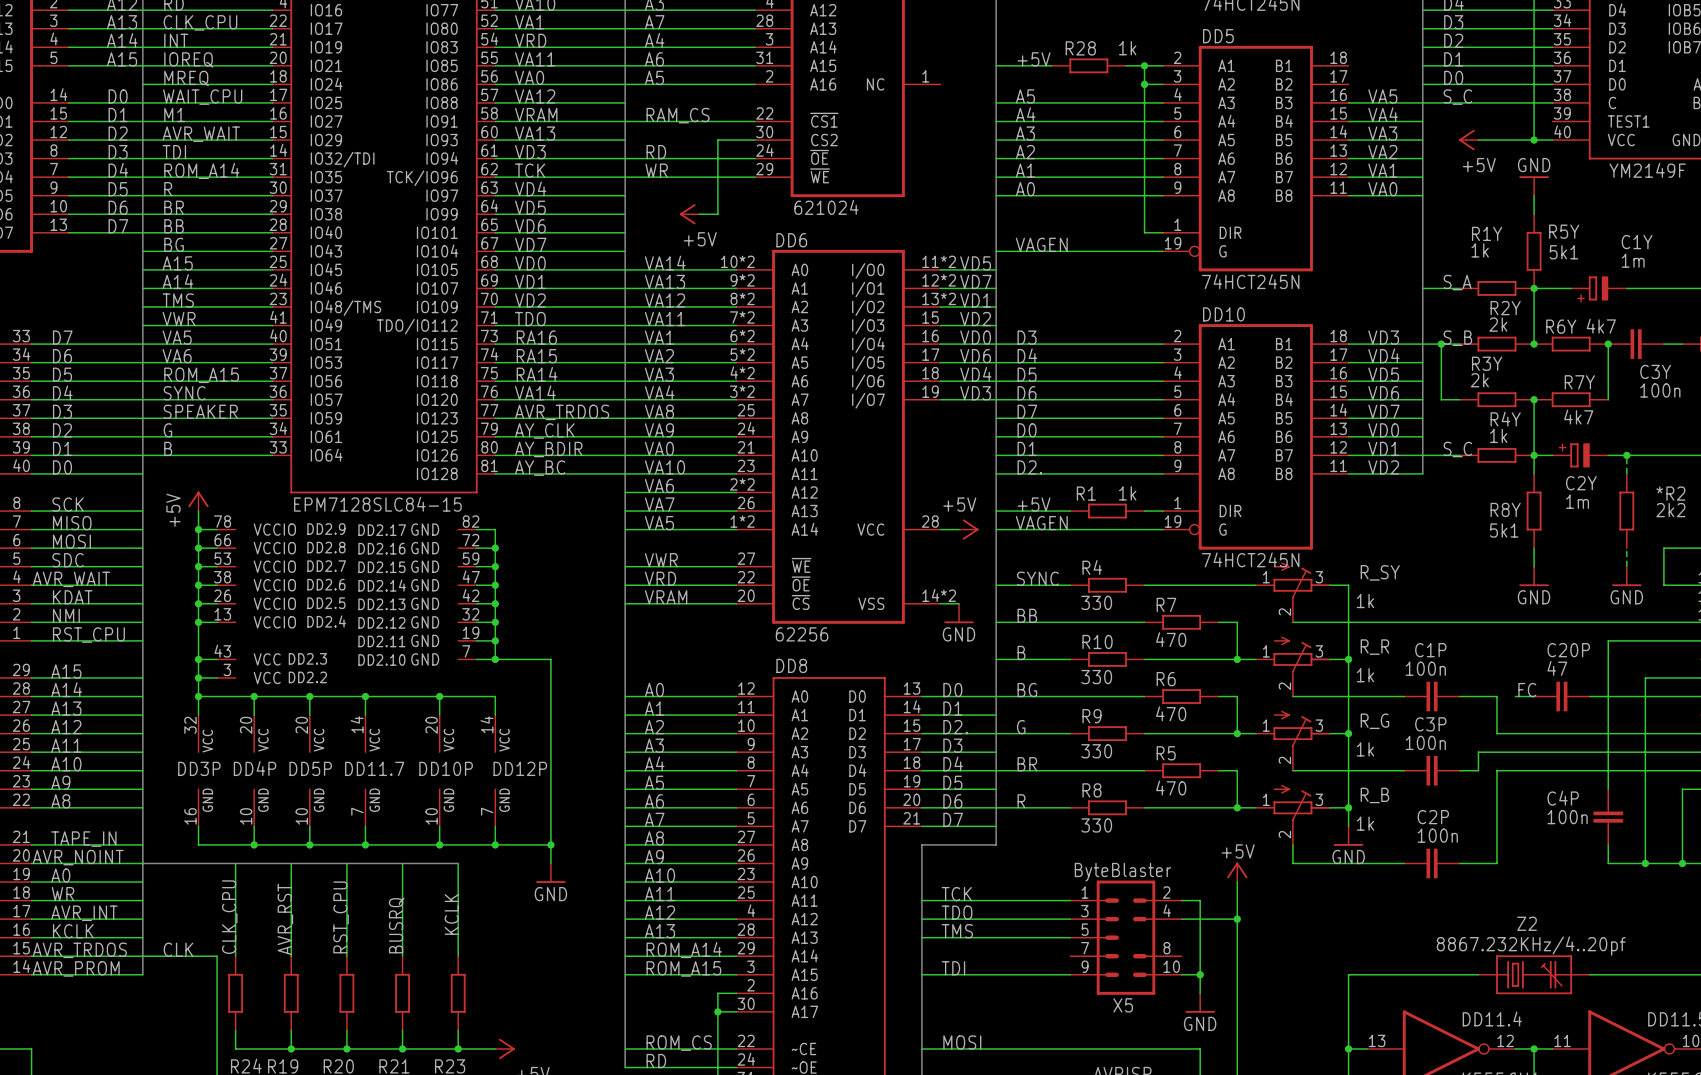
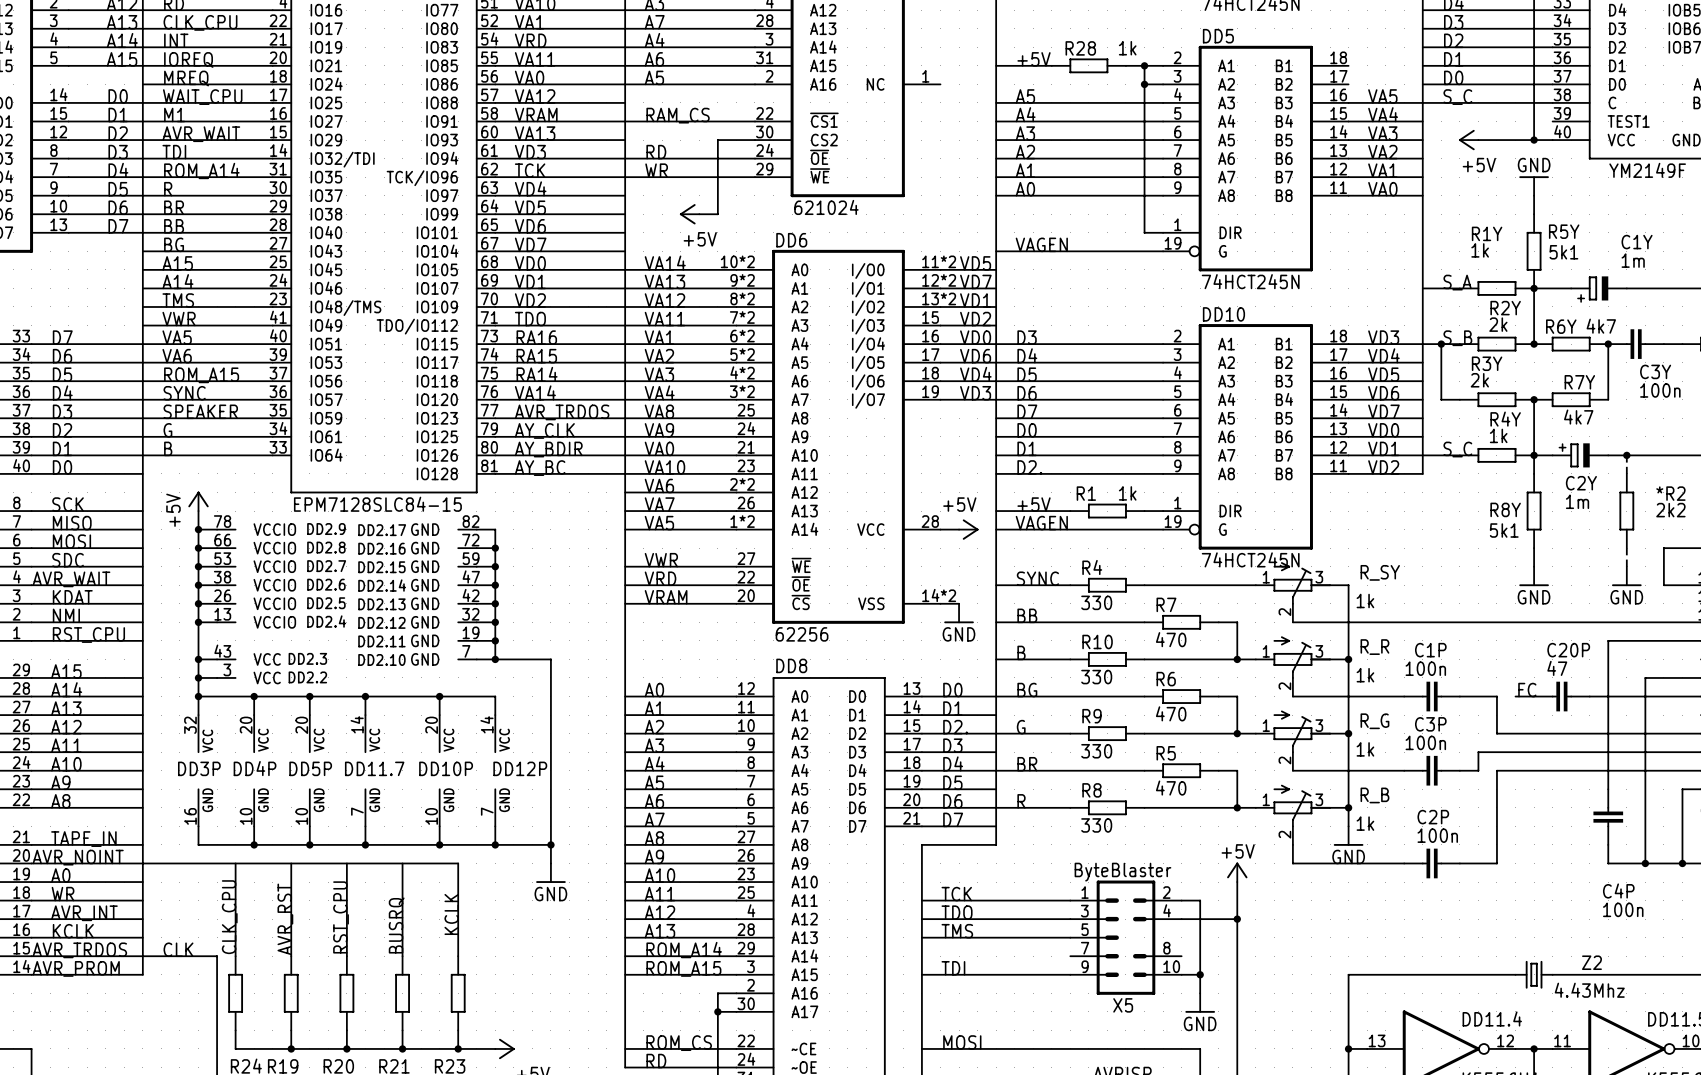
C4P name position: C4P (1563, 798) -> C4P (1618, 890)
C4P value position: 100n (1567, 817) -> 100n (1623, 909)
Z2 name position: Z2 (1527, 923) -> Z2 (1591, 962)
Z2 value: 8867.232KHz/4..20pf (1531, 946) -> 4.43Mhz (1589, 990)
Z2 symbol: [1477, 955, 1591, 995] -> [1514, 960, 1554, 989]

